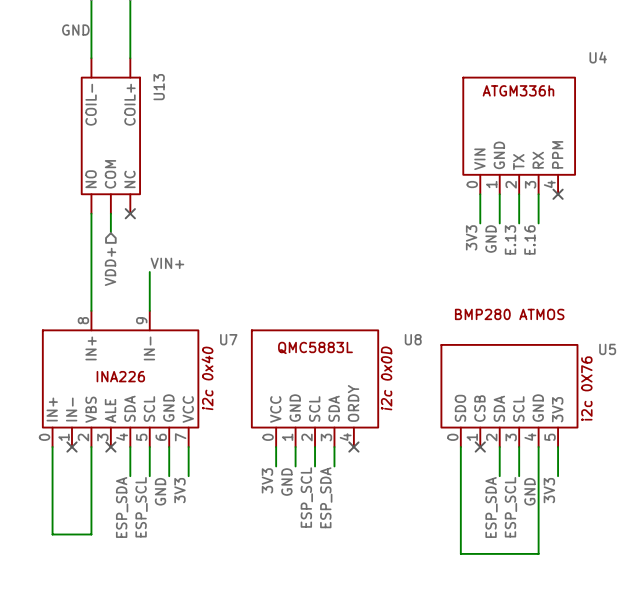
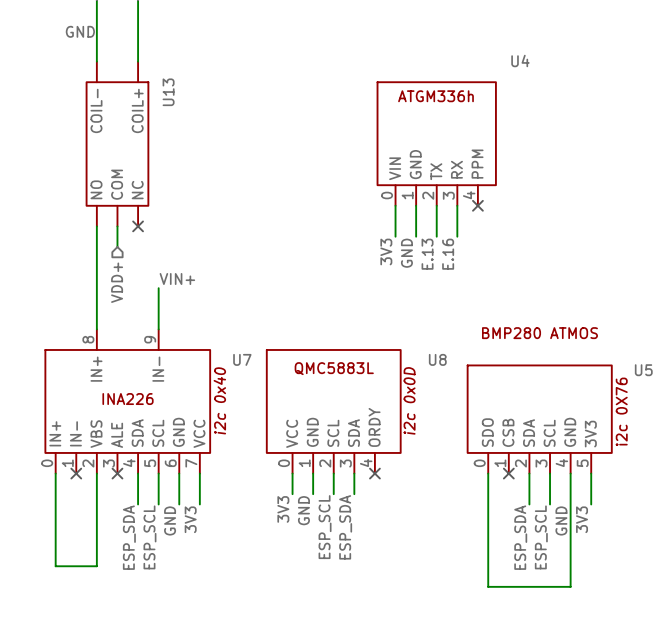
U4 position: (519, 135) -> (436, 144)
no-connect mark: none -> (477, 205)
wire: (480, 194) (480, 223) -> (457, 205) (457, 236)
wire: (499, 194) (499, 223) -> (436, 205) (436, 236)
wire: (519, 194) (519, 223) -> (416, 205) (416, 236)
wire: (538, 194) (538, 223) -> (395, 205) (395, 236)
no-connect mark: (558, 194) -> none
label position: 3V3 (471, 237) -> 3V3 (386, 251)
label position: GND (491, 239) -> GND (406, 253)
label position: E.13 (510, 239) -> E.13 (427, 254)
label position: E.16 (529, 239) -> E.16 (448, 254)

